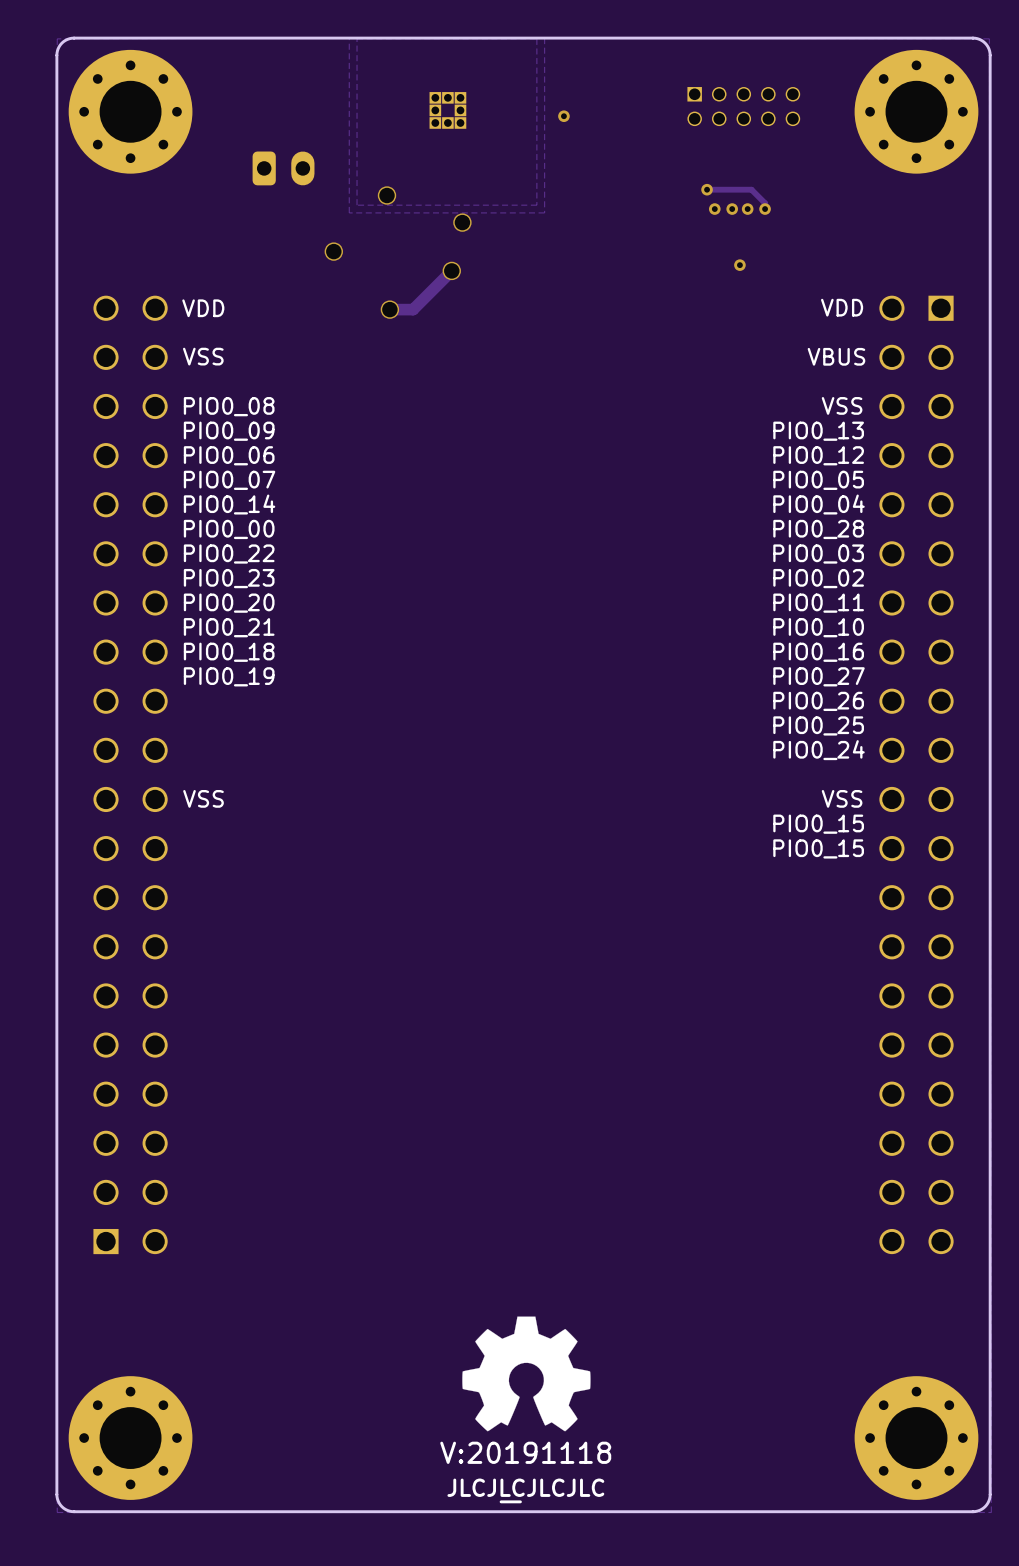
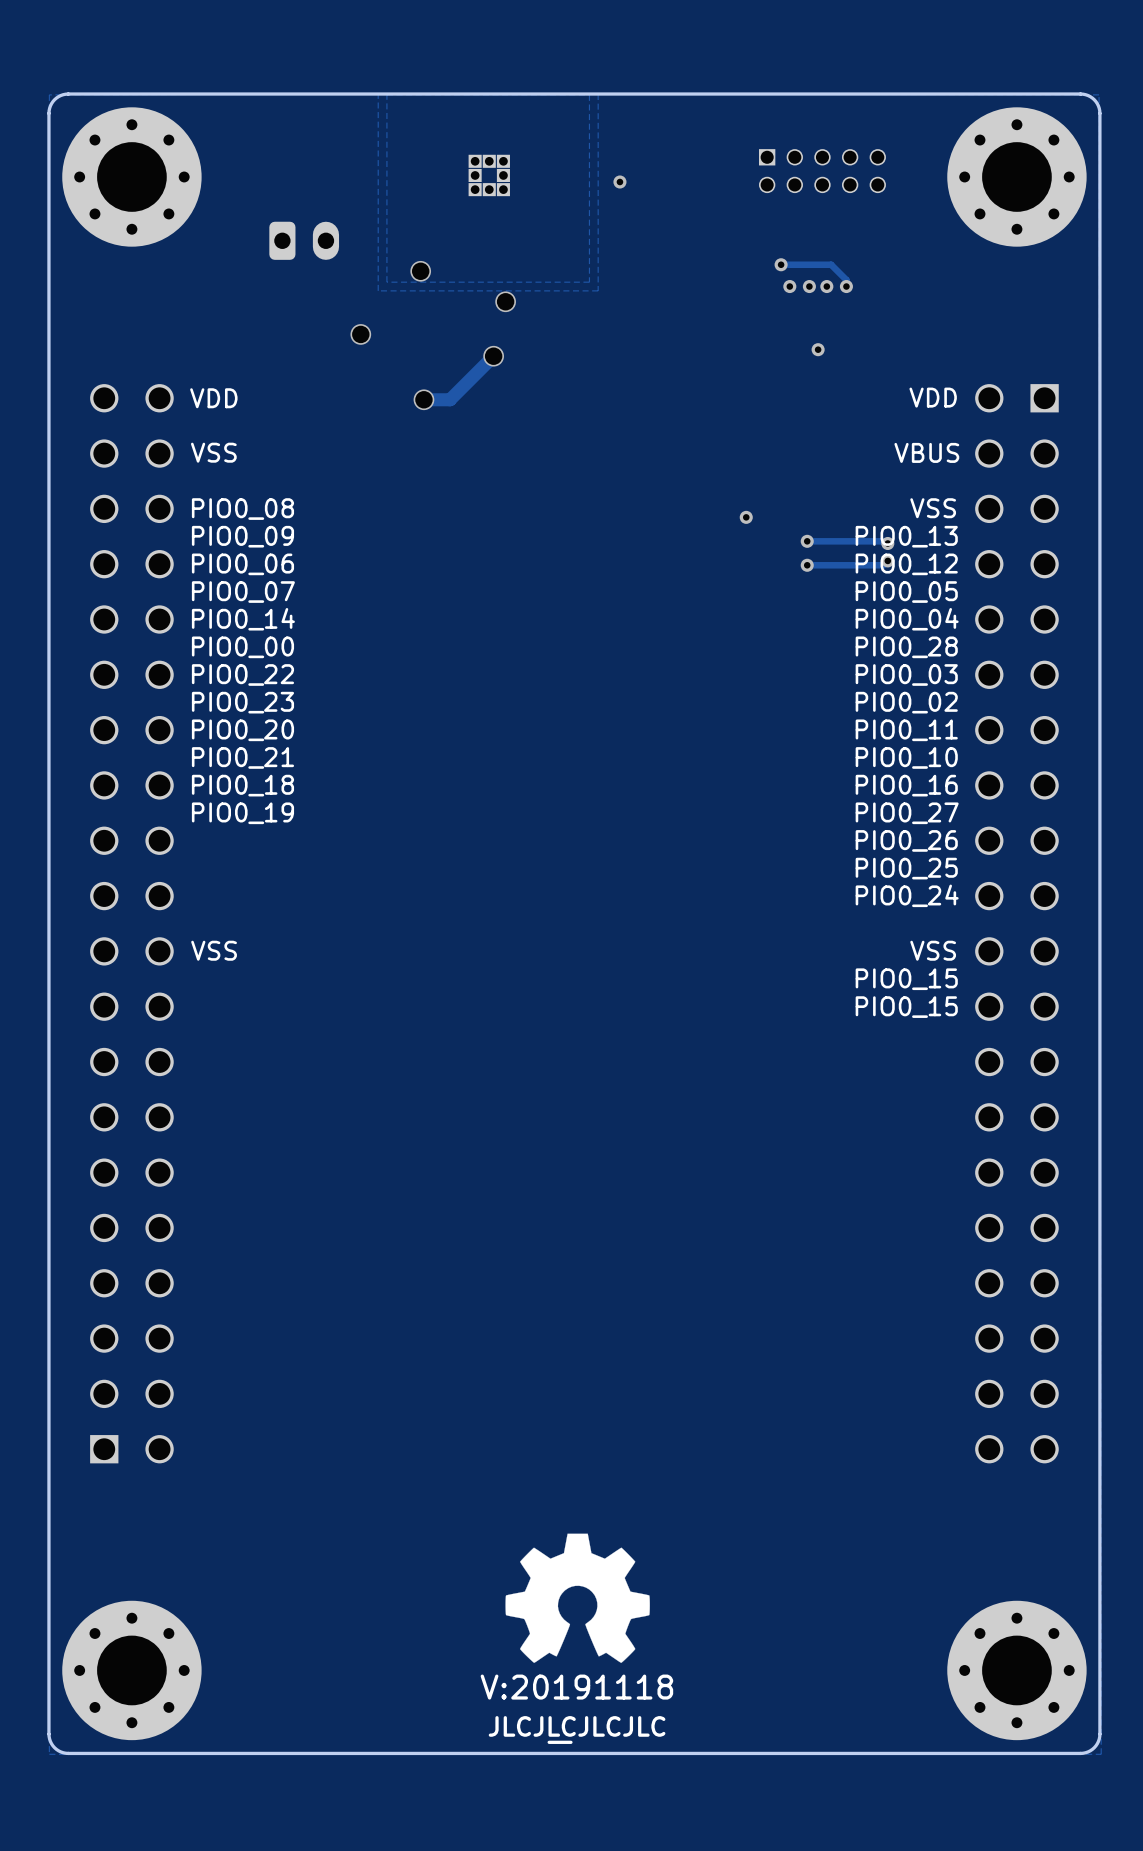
via: none -> (746, 517)
track: none -> (807, 541) (885, 541) (887, 543)
via: none -> (807, 541)
via: none -> (887, 543)
track: none -> (887, 560) (883, 565) (807, 565)
via: none -> (887, 560)
via: none -> (807, 565)

